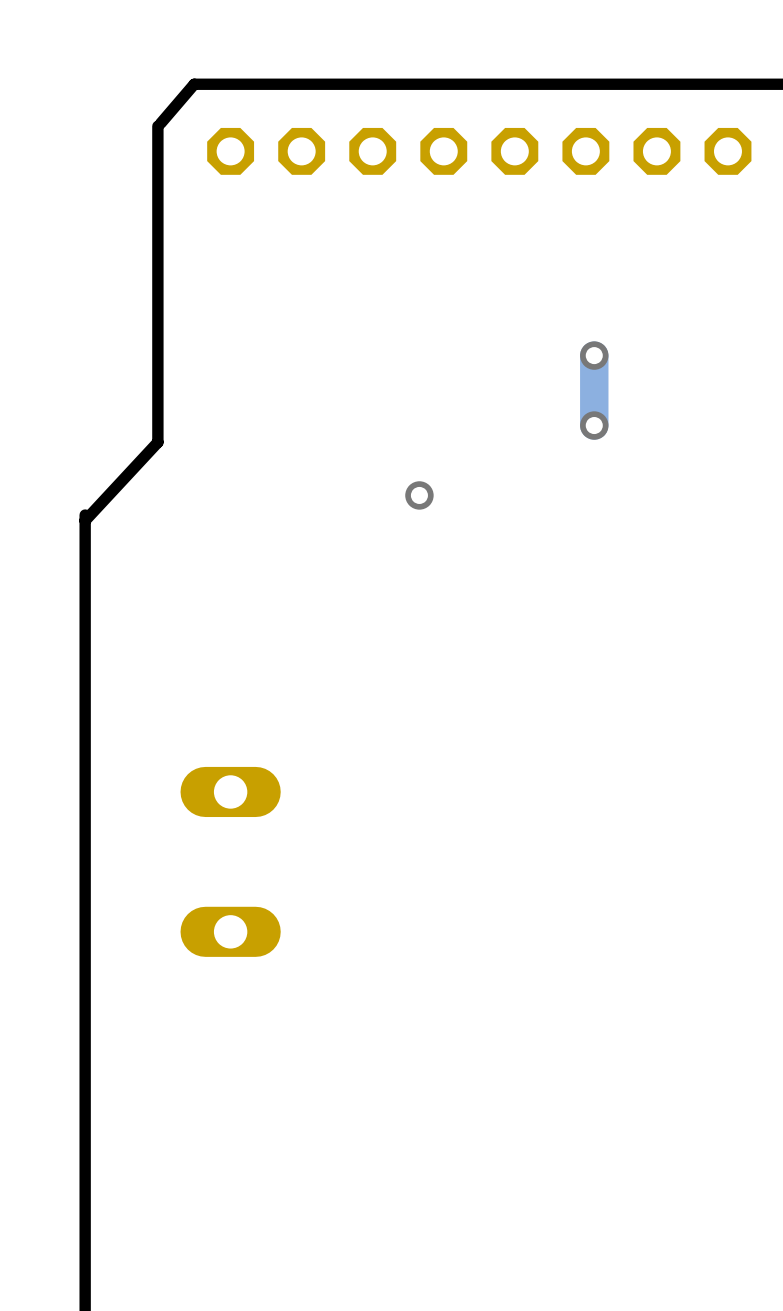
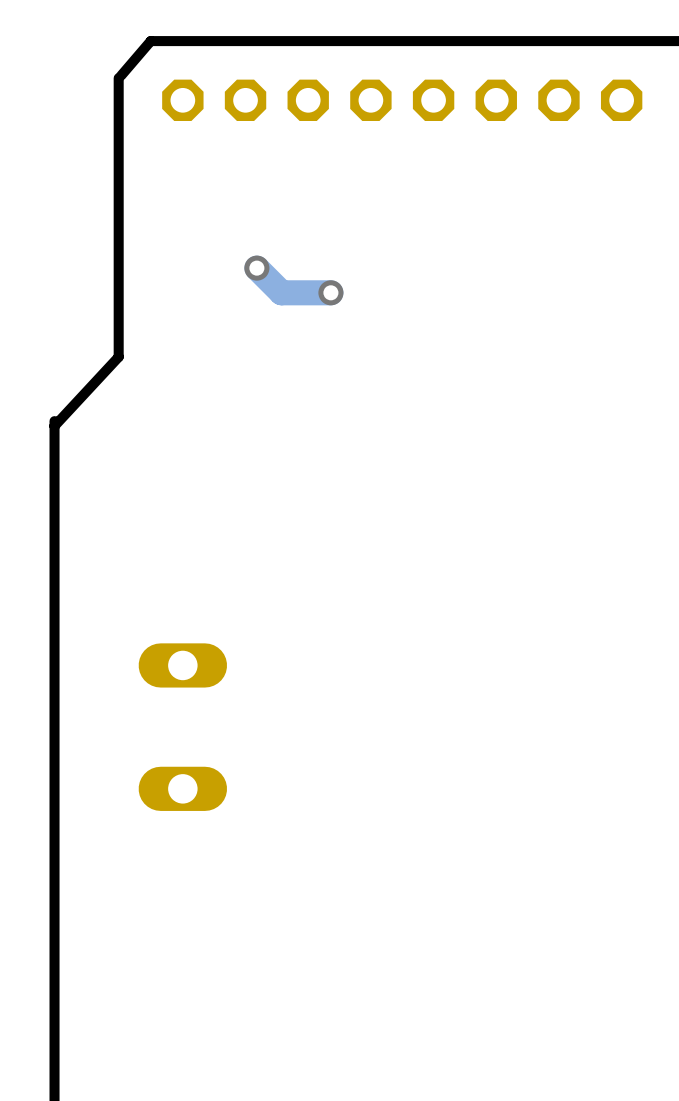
track: none -> (256, 268) (281, 292) (330, 292)
via: none -> (256, 268)
track: (594, 355) (594, 425) -> none
via: (594, 355) -> none
via: none -> (330, 292)
via: (594, 425) -> none
via: (419, 495) -> none

